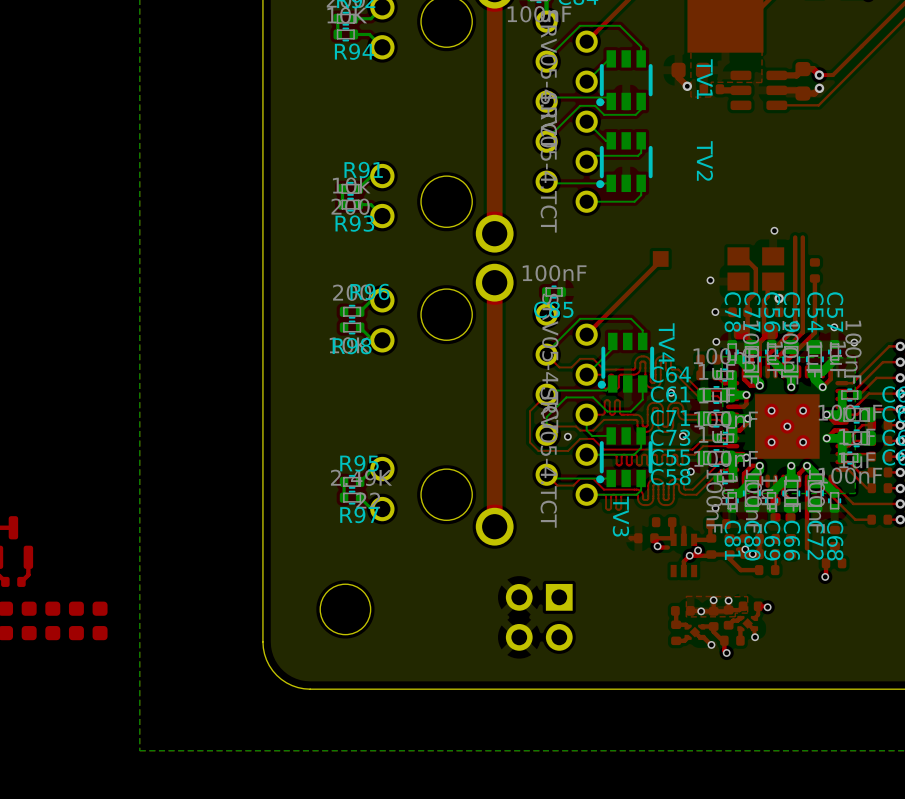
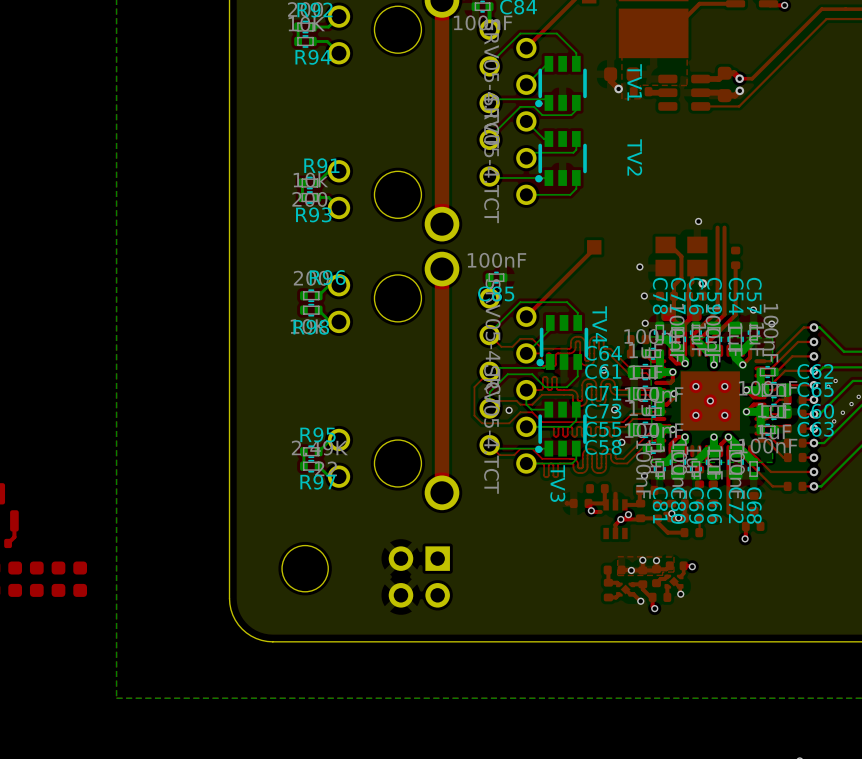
part position: (539, 617) -> (419, 576)

